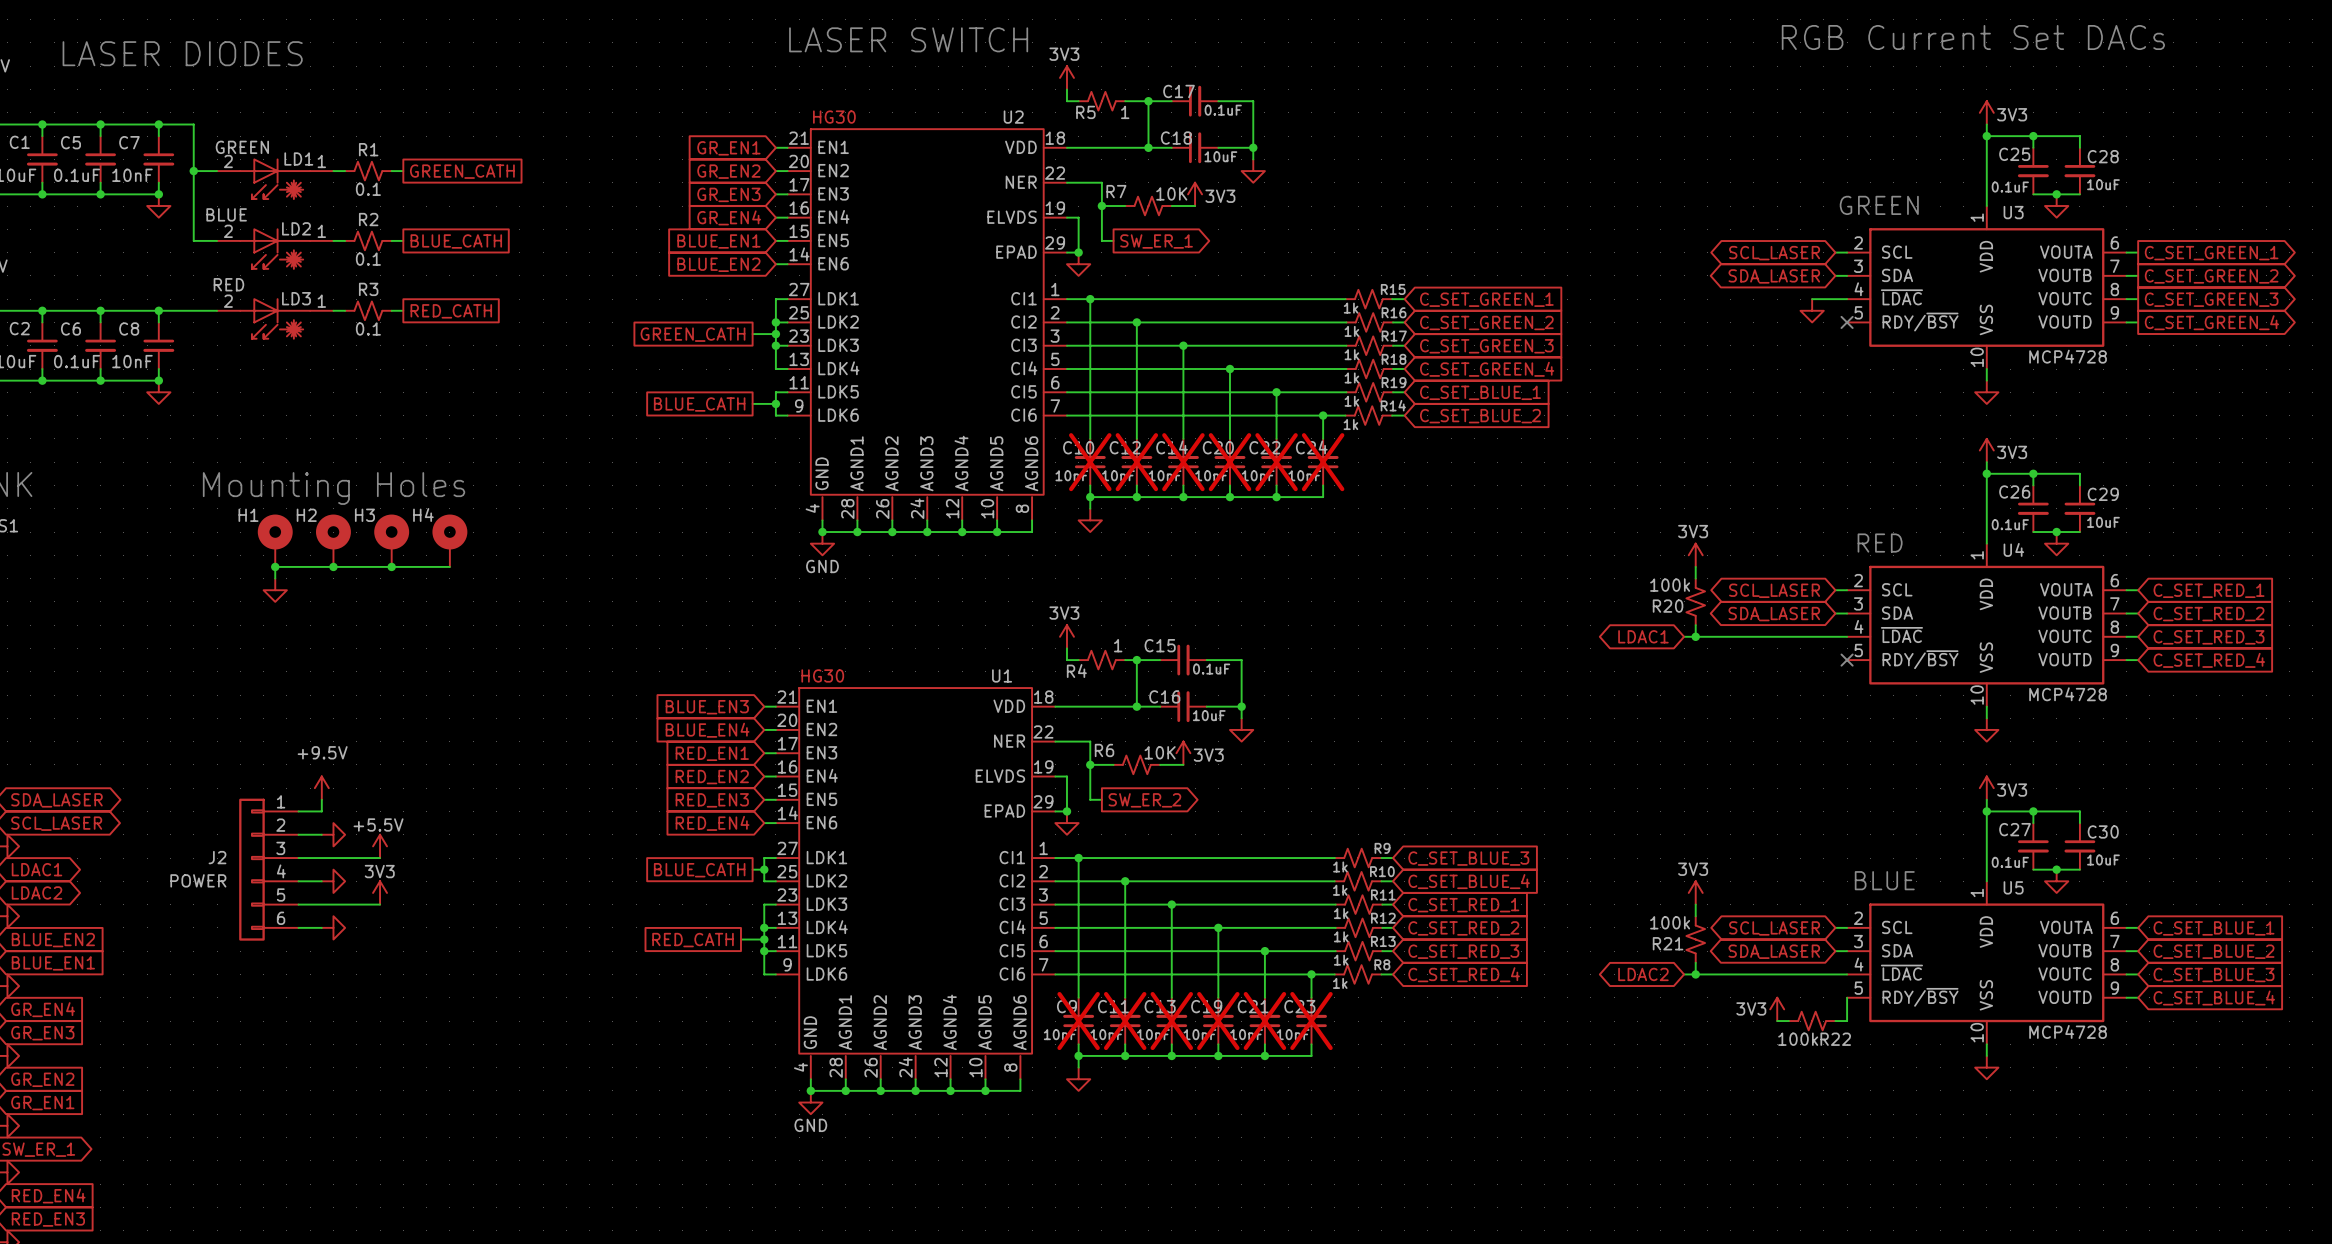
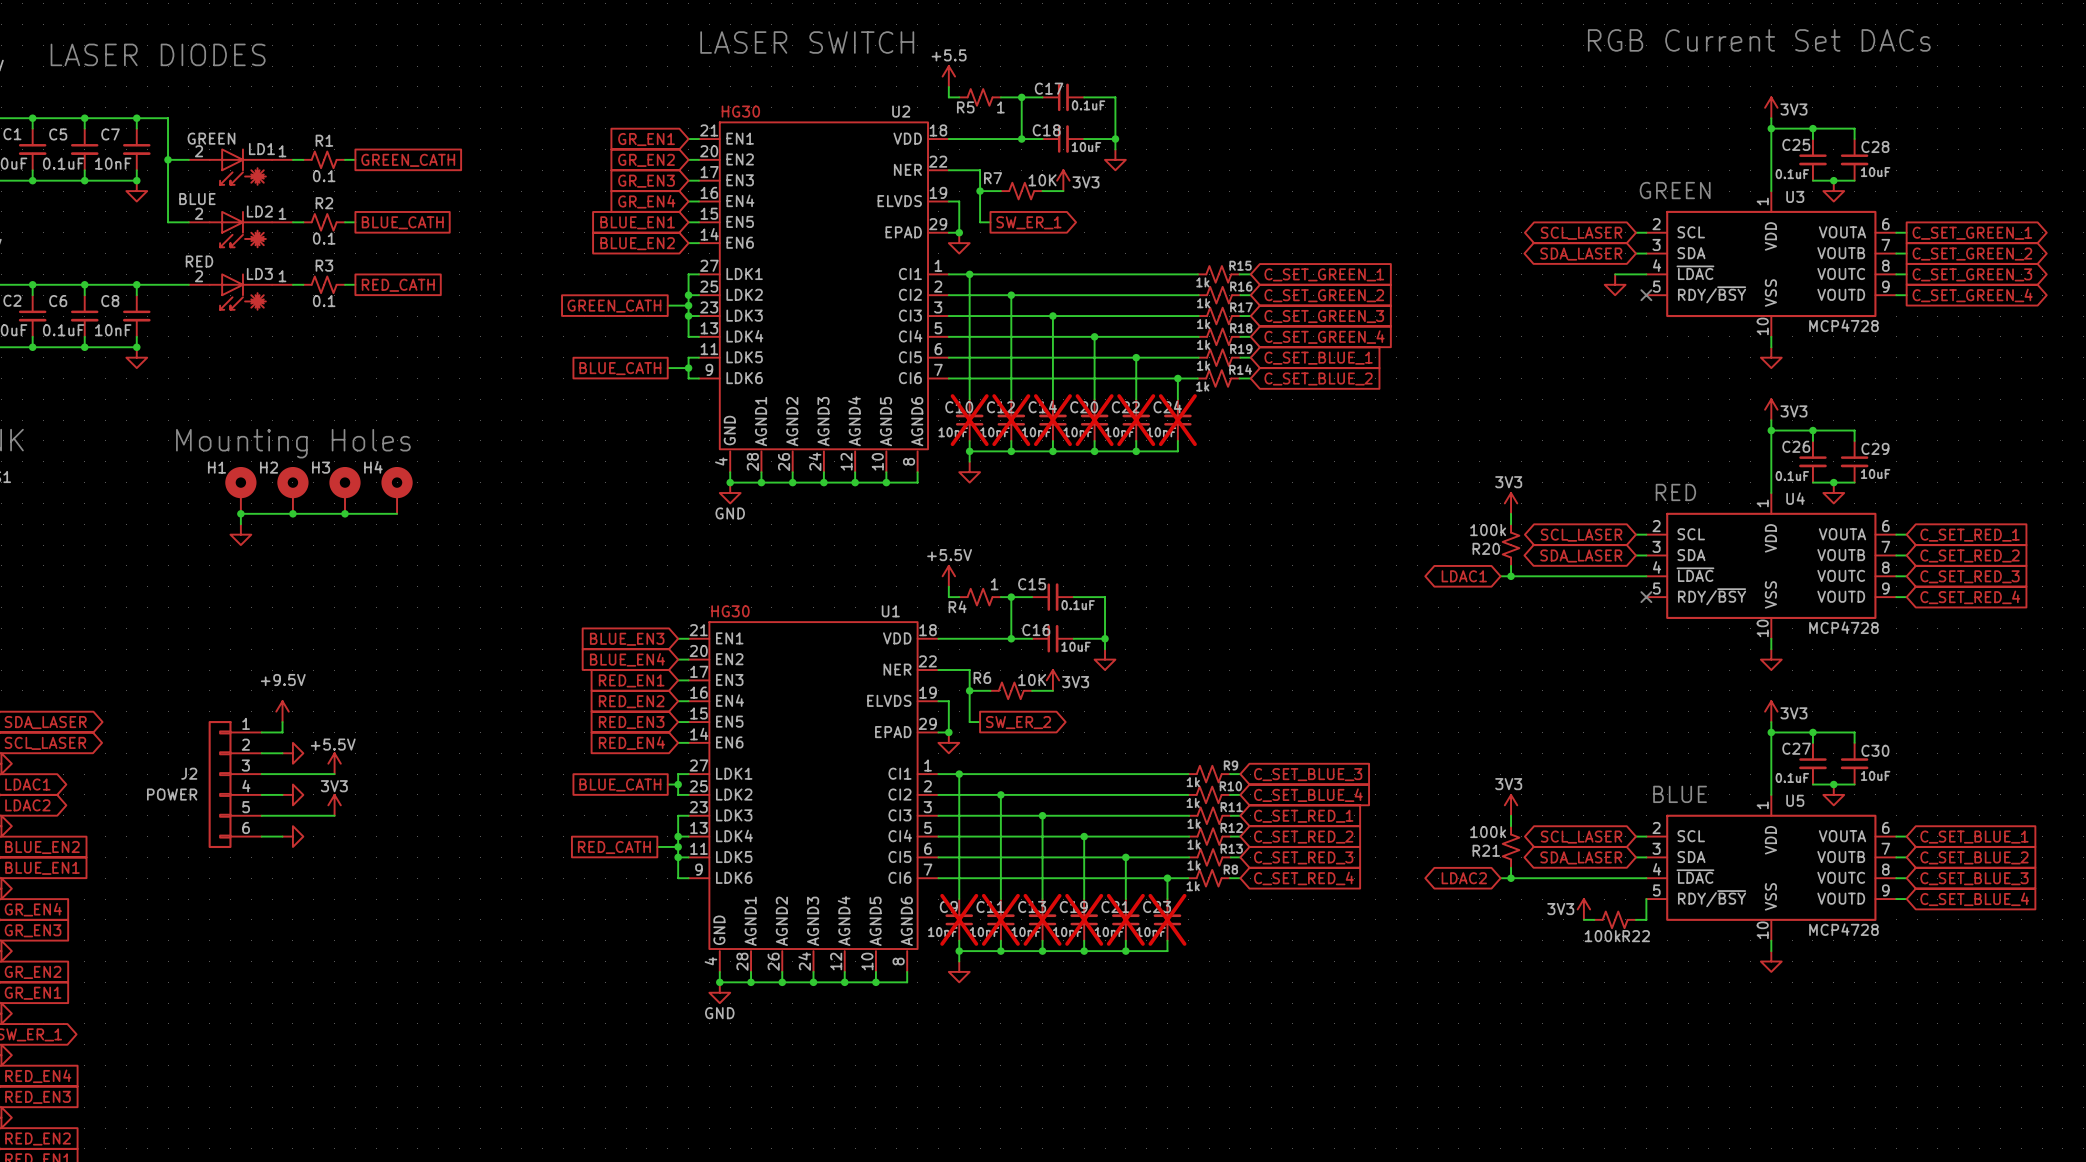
power symbol: 3V3 (1066, 77) -> +5.5 (948, 76)
power symbol: 3V3 (1066, 636) -> +5.5V (948, 576)

